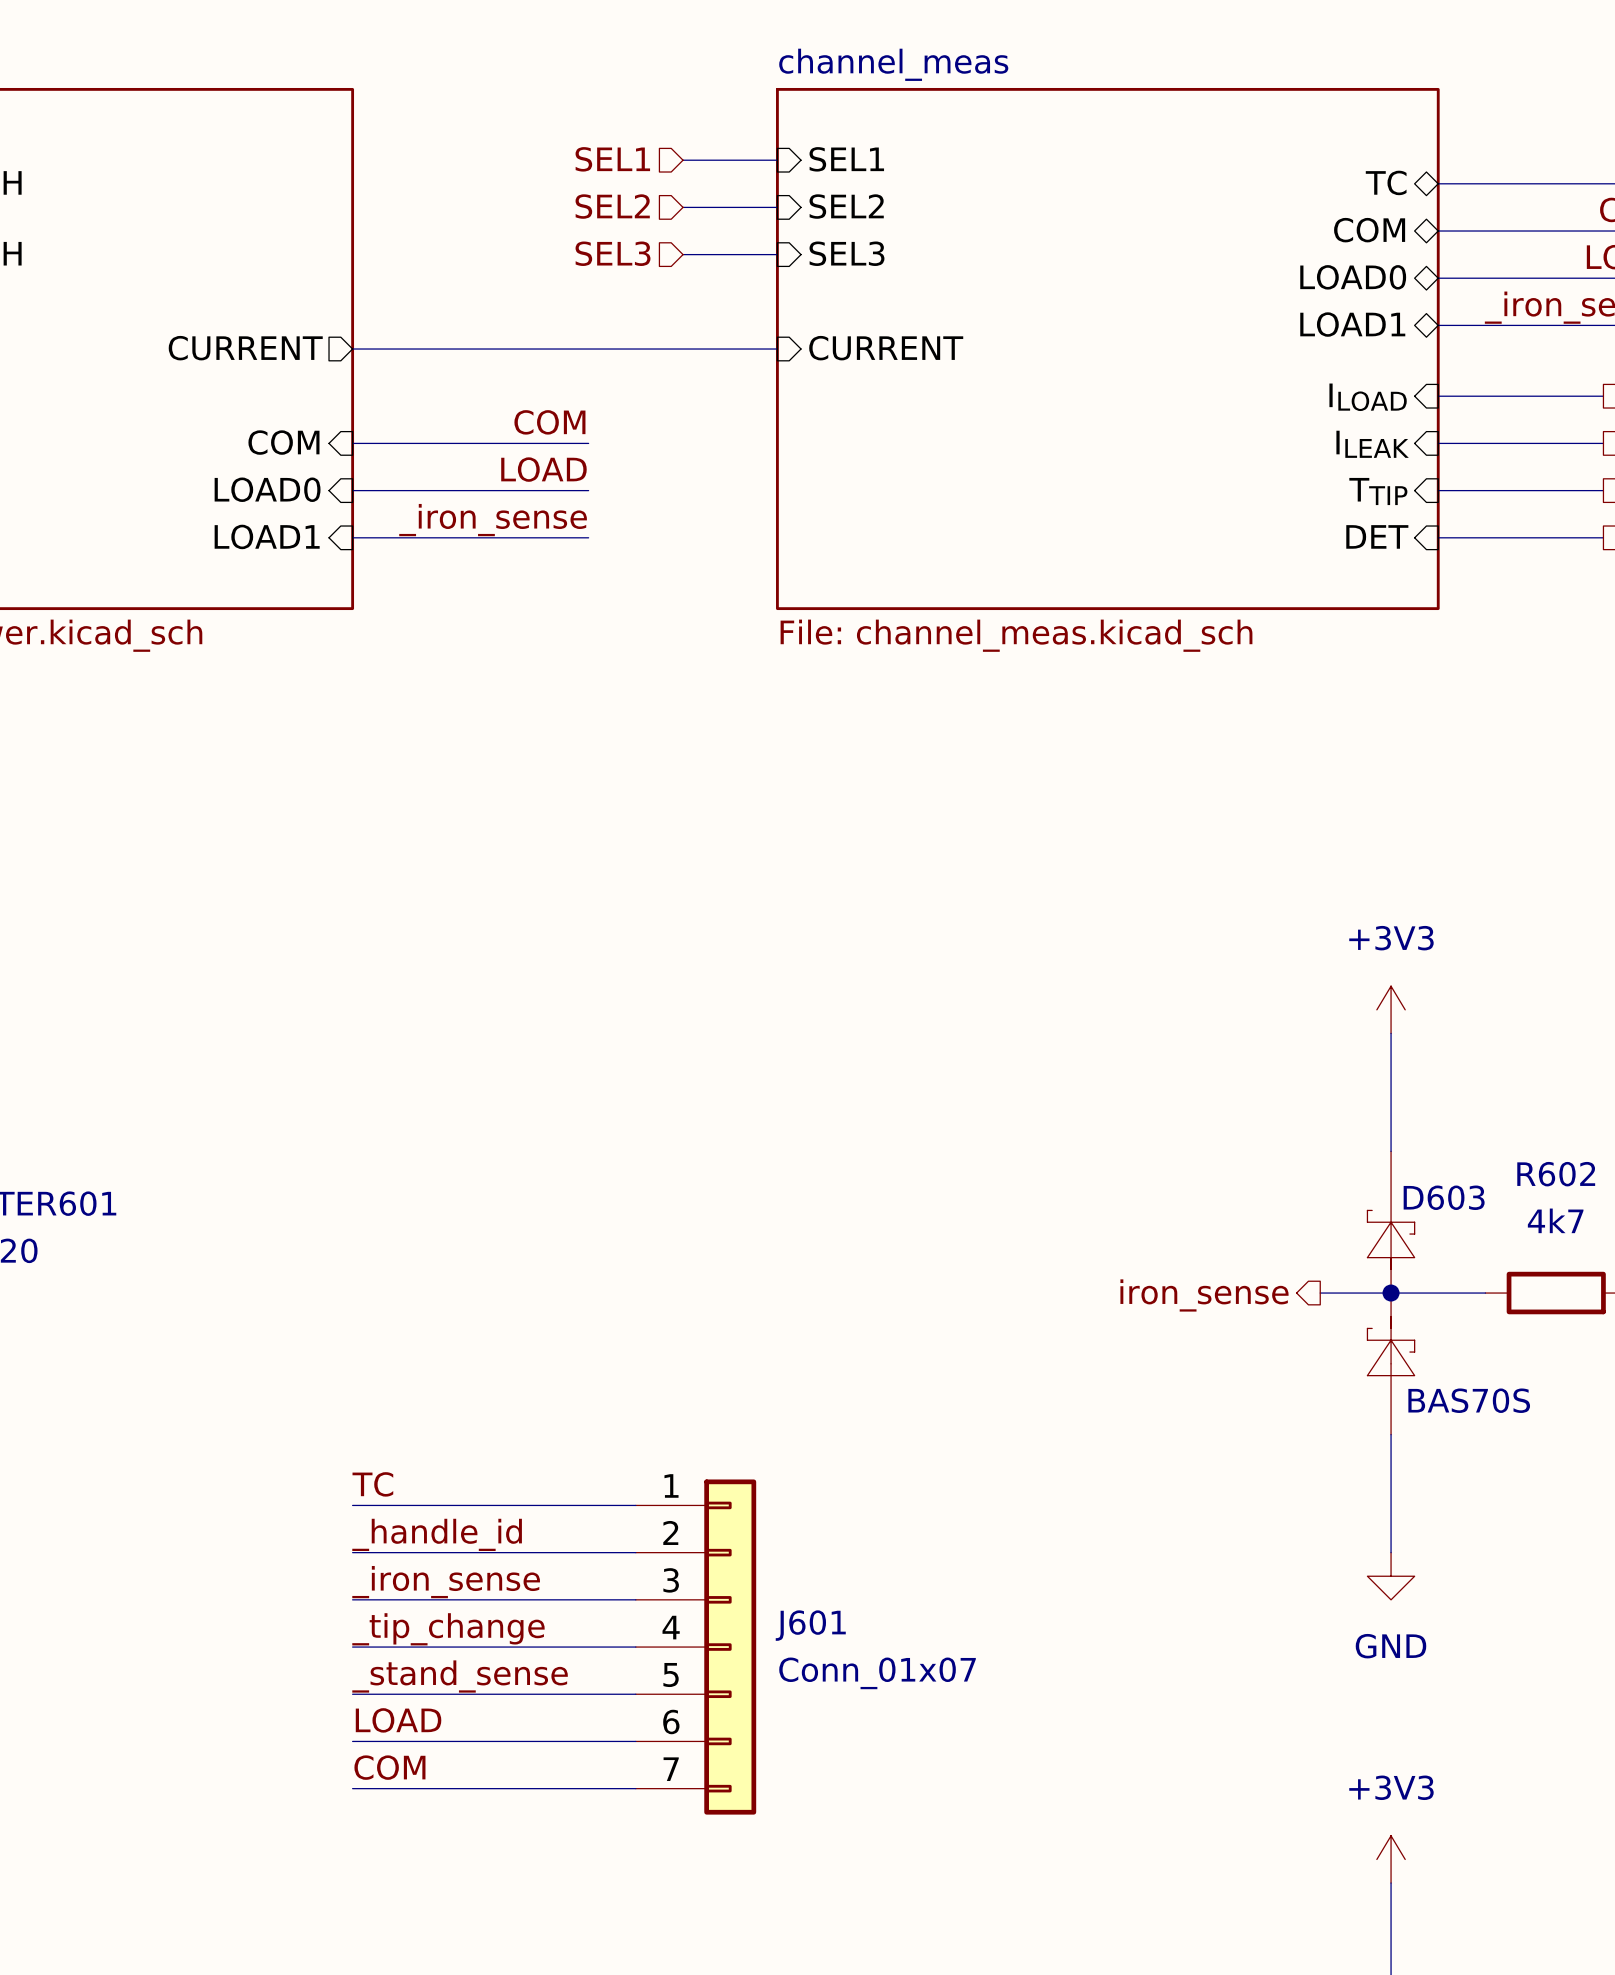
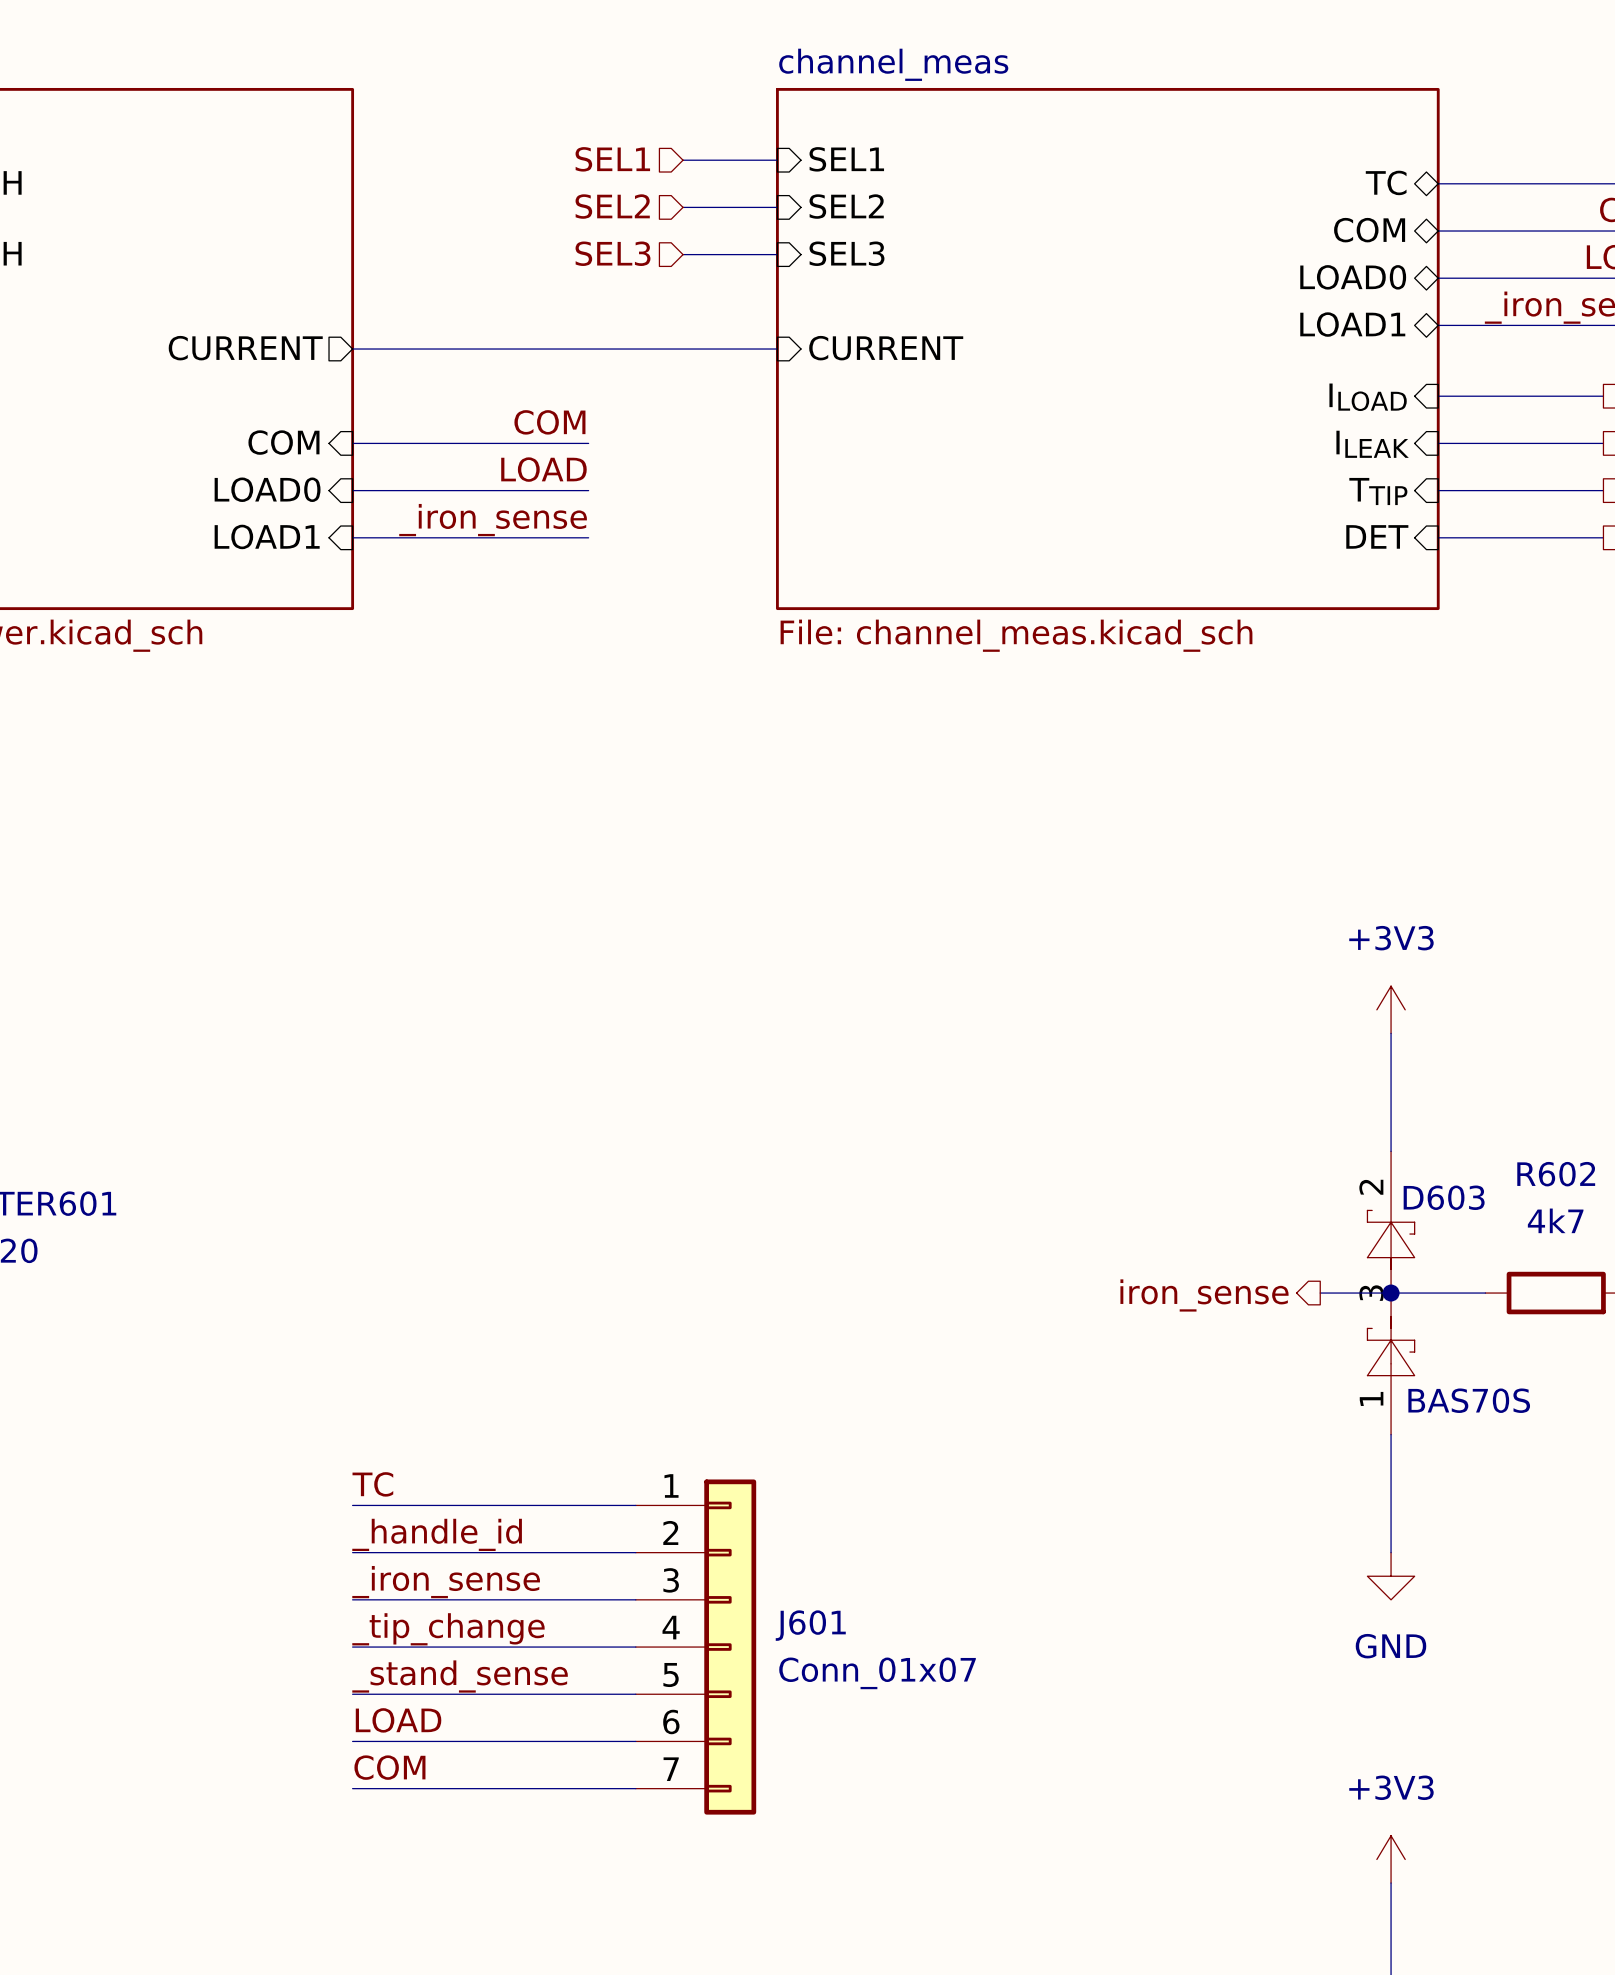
D603 pin number: none -> 2 (1371, 1187)
D603 pin number: none -> 3 (1371, 1293)
D603 pin number: none -> 1 (1371, 1398)

